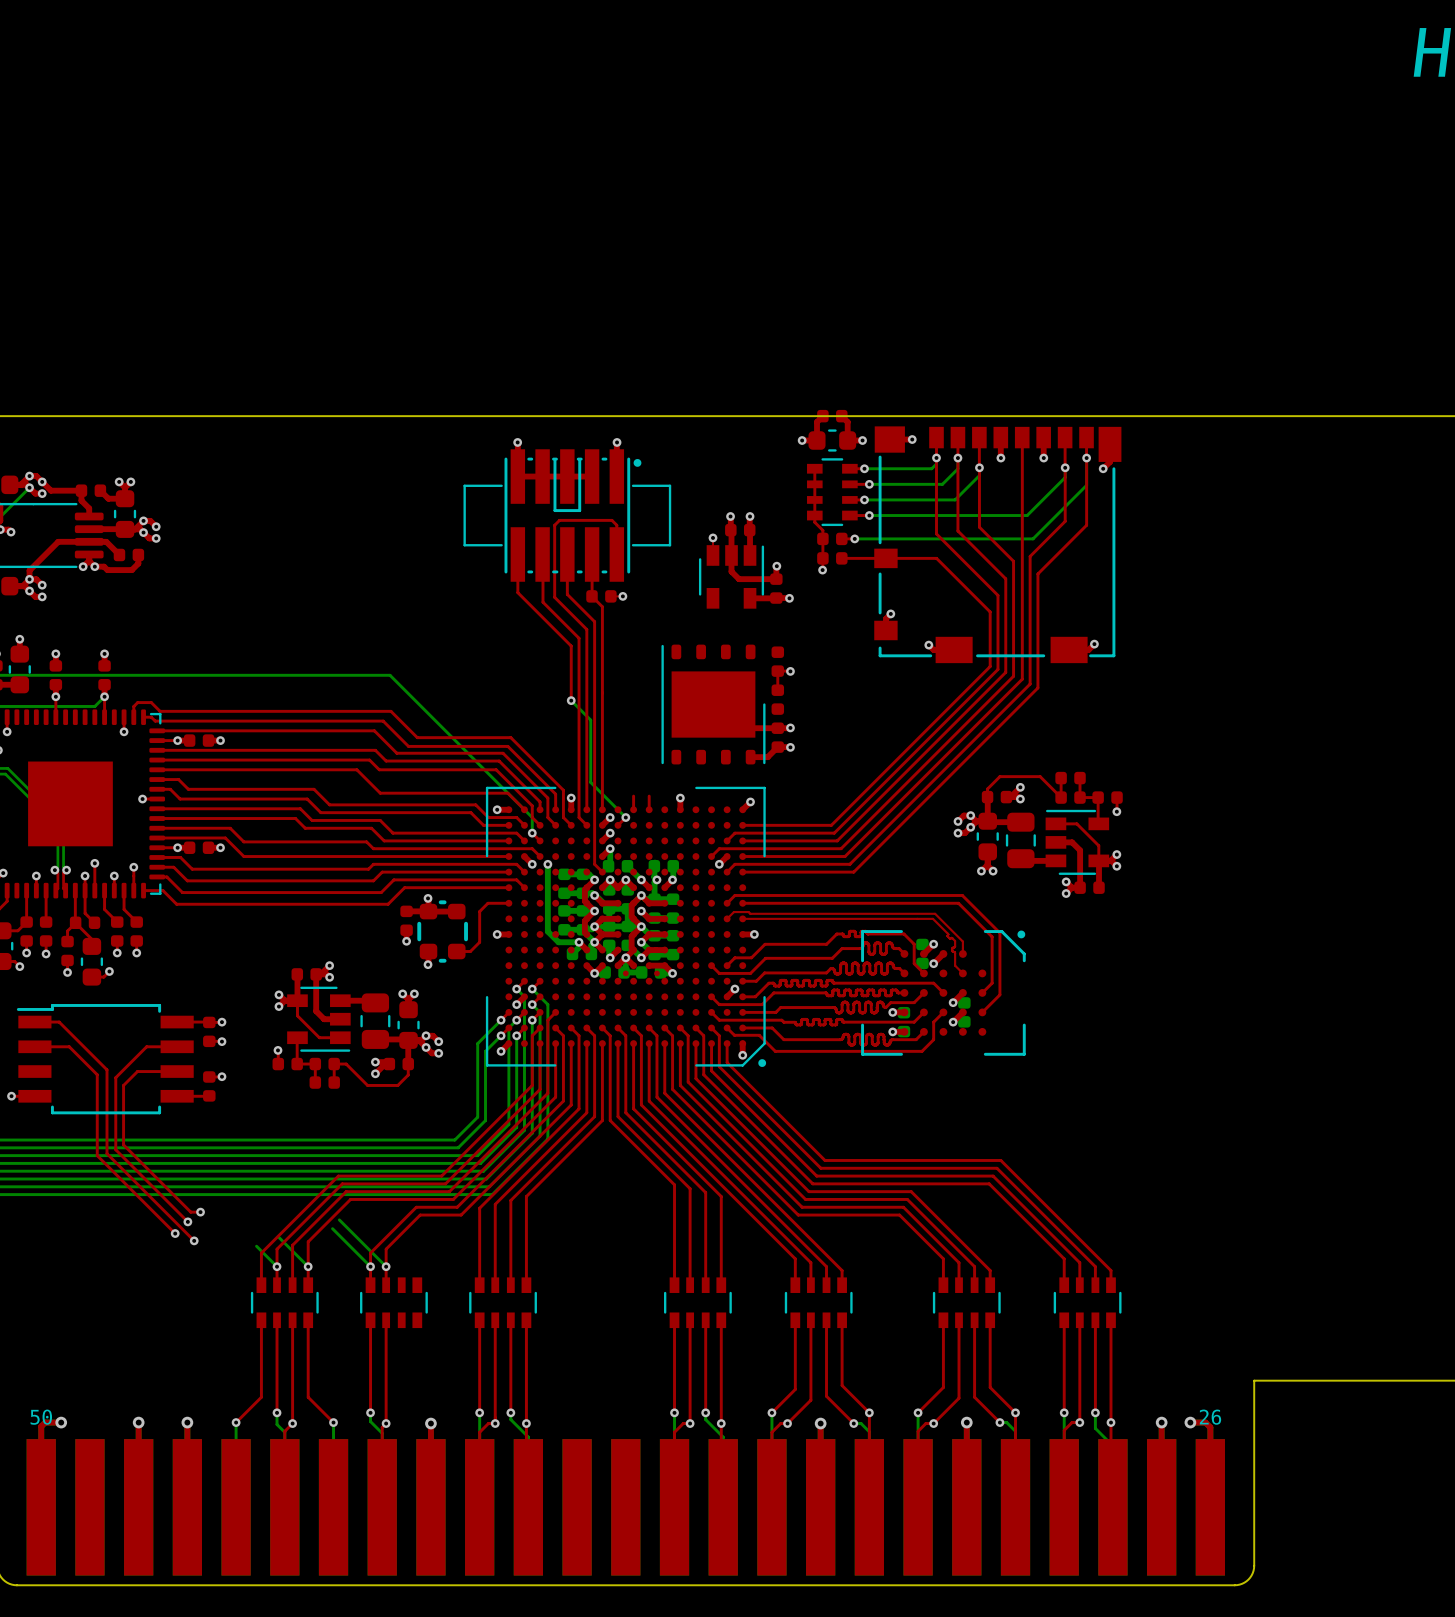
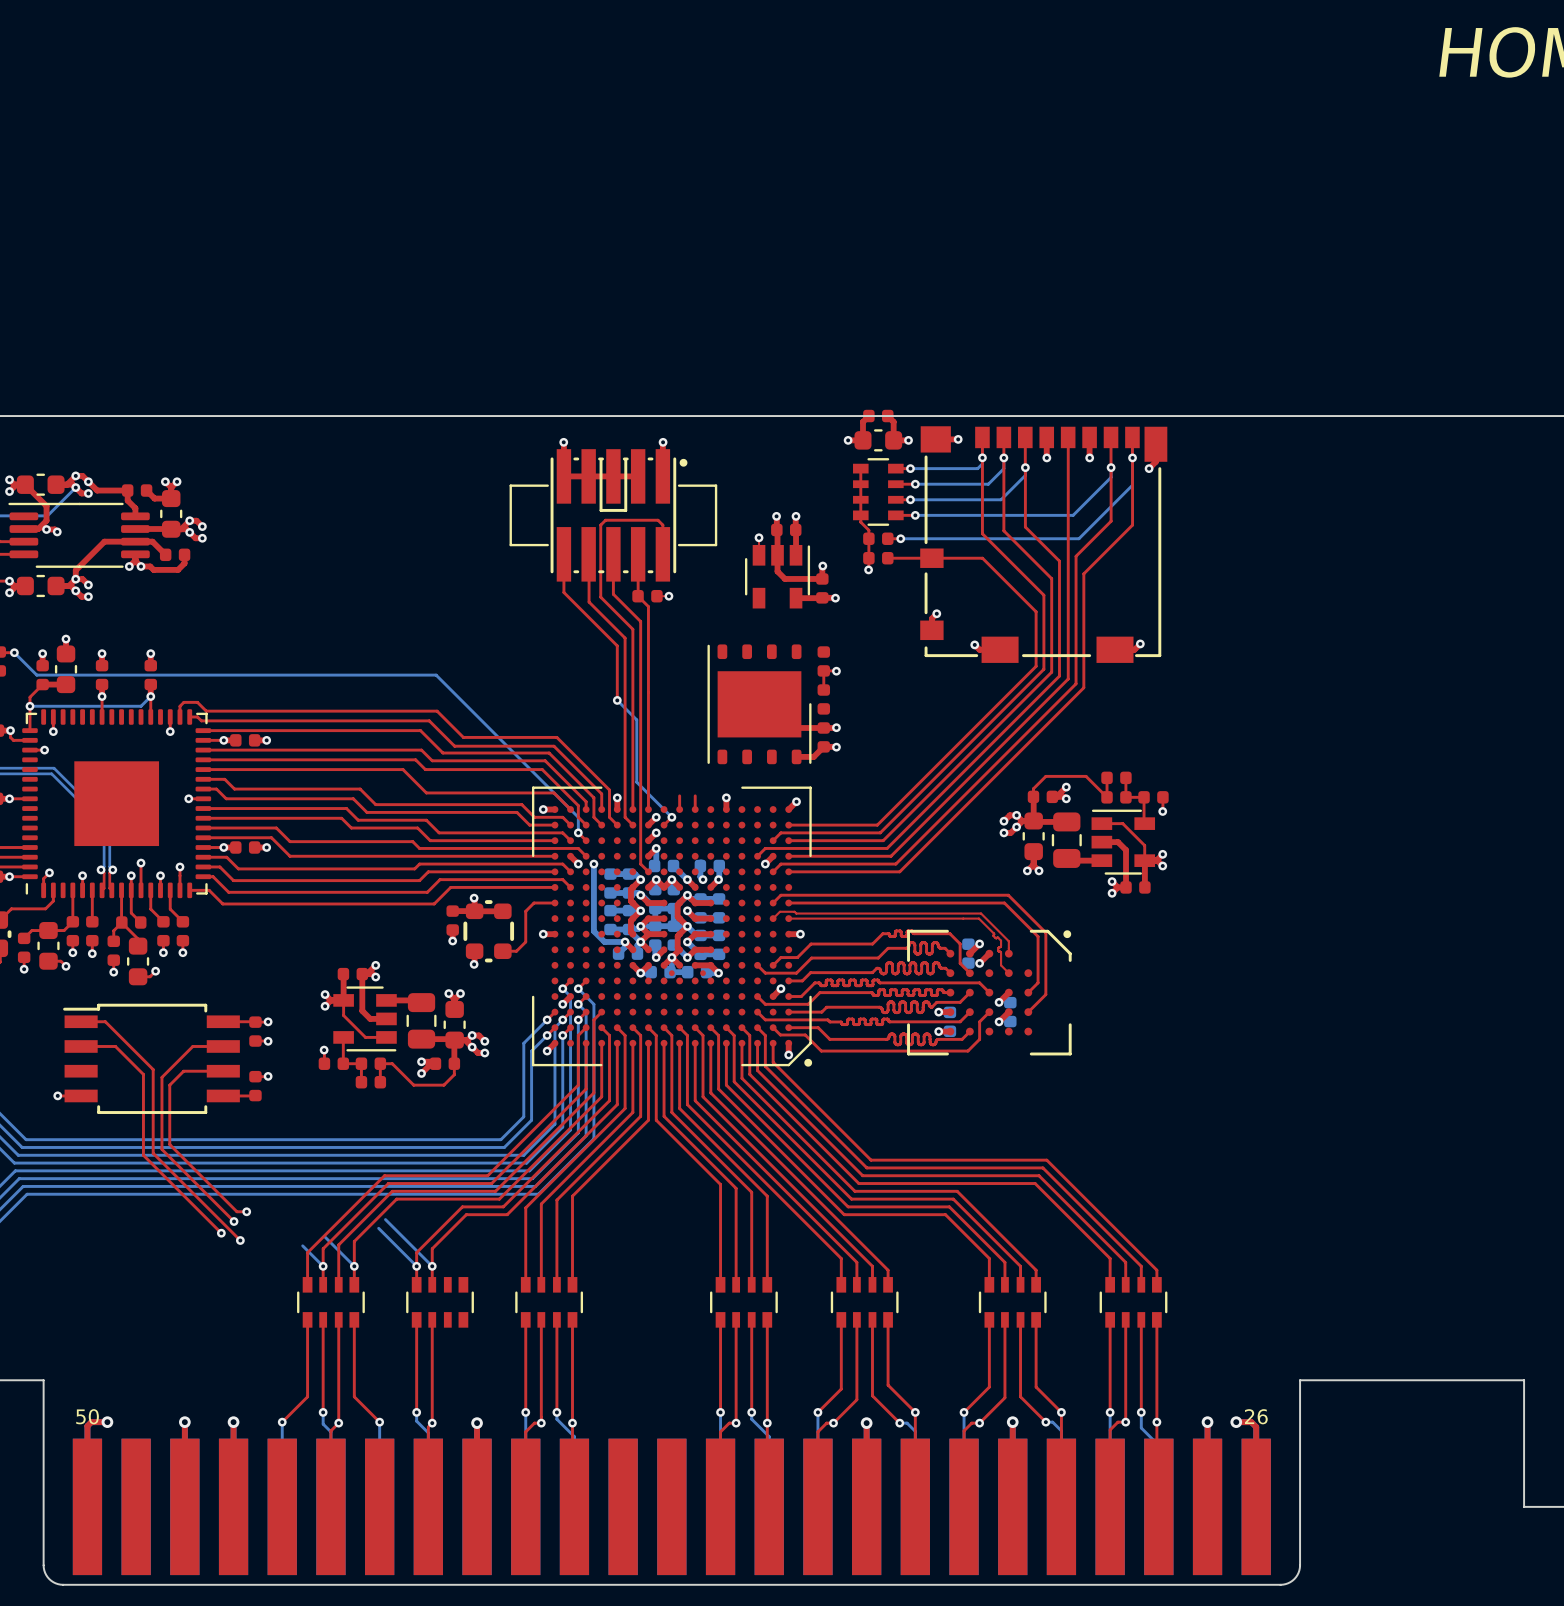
bottom track: (656, 879) (654, 882) (654, 899) -> none

